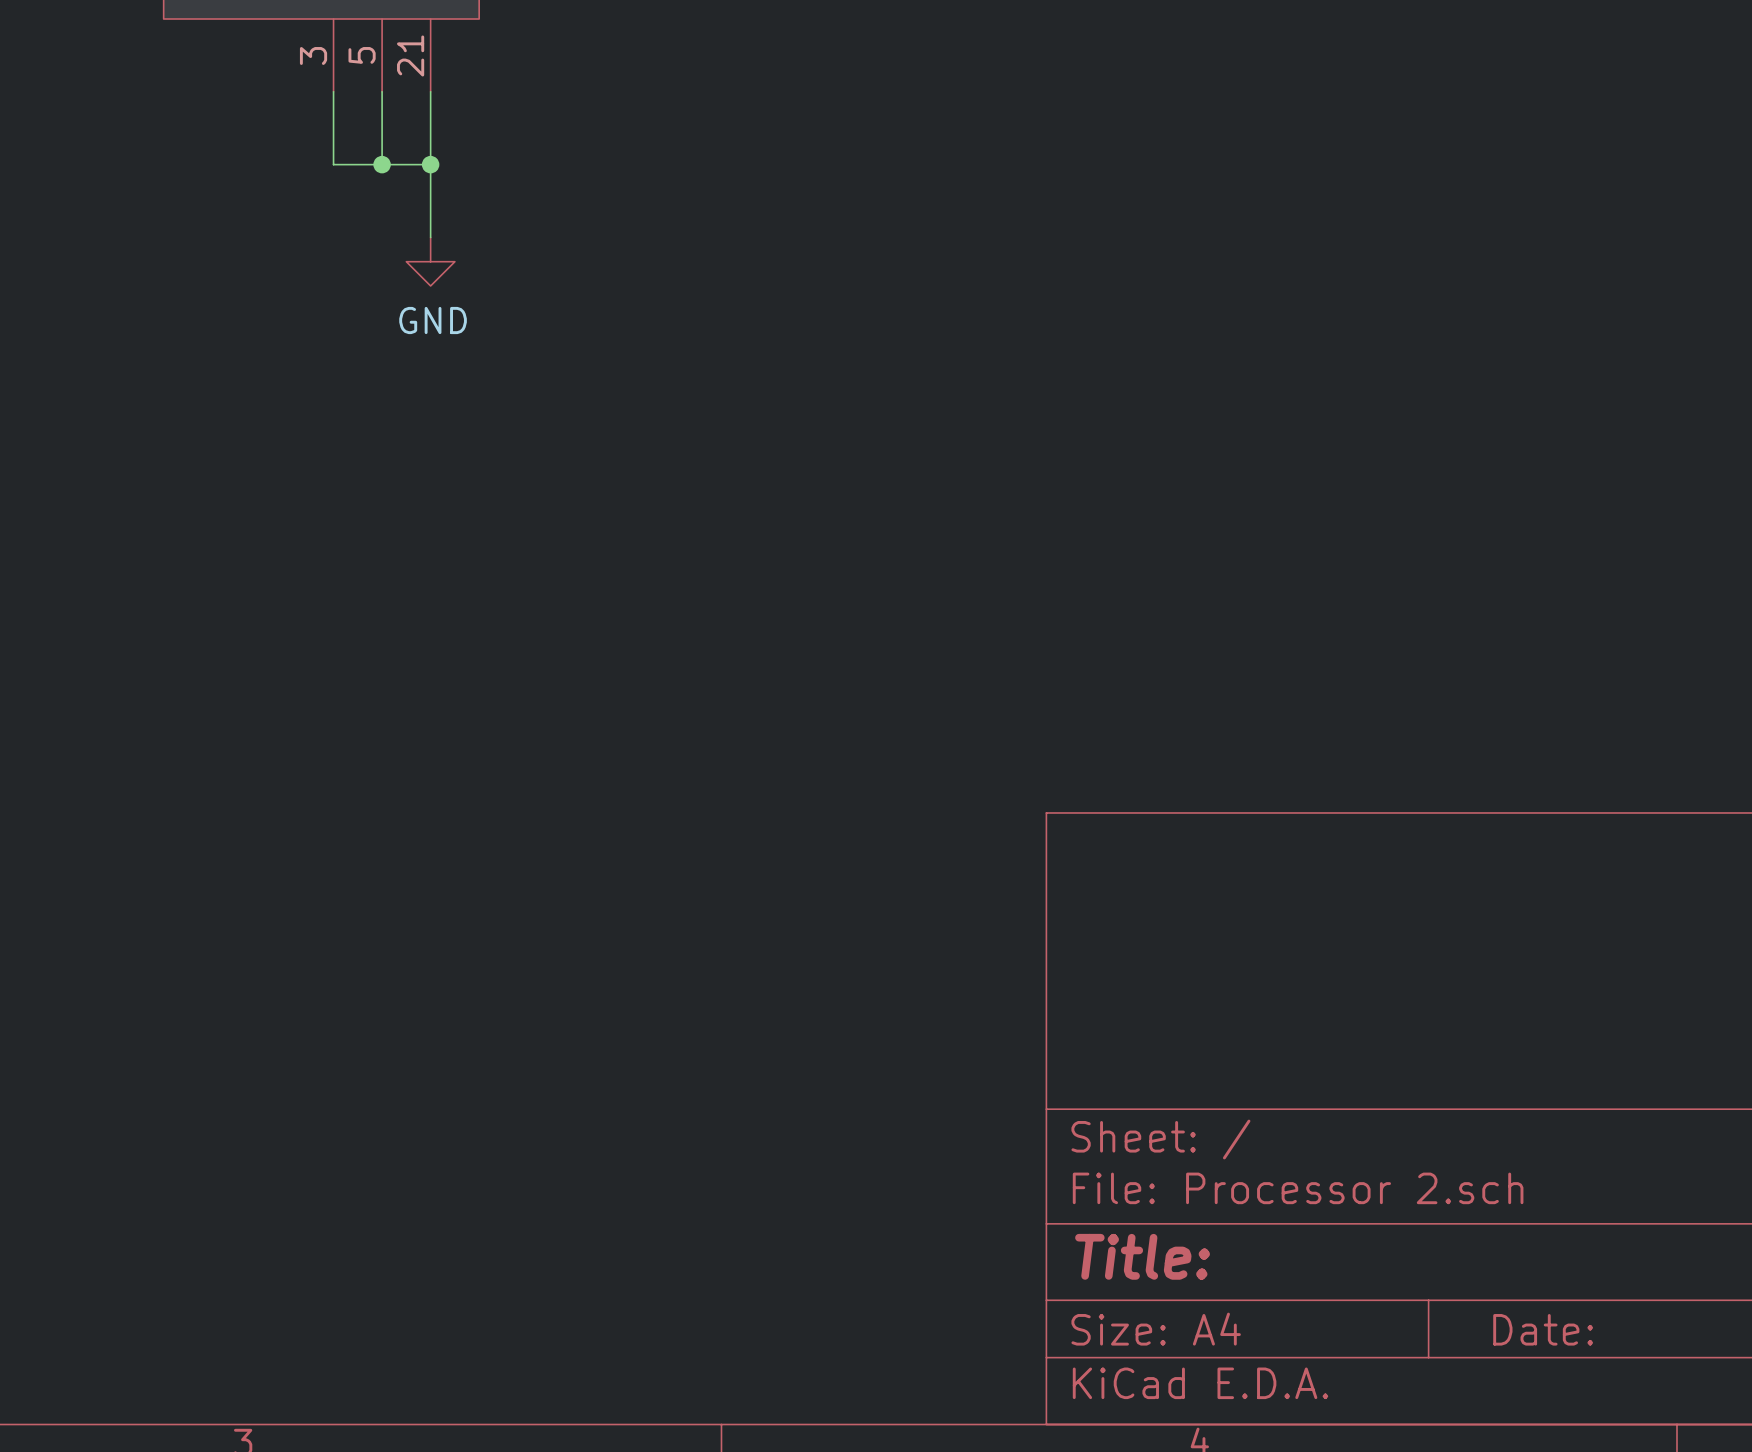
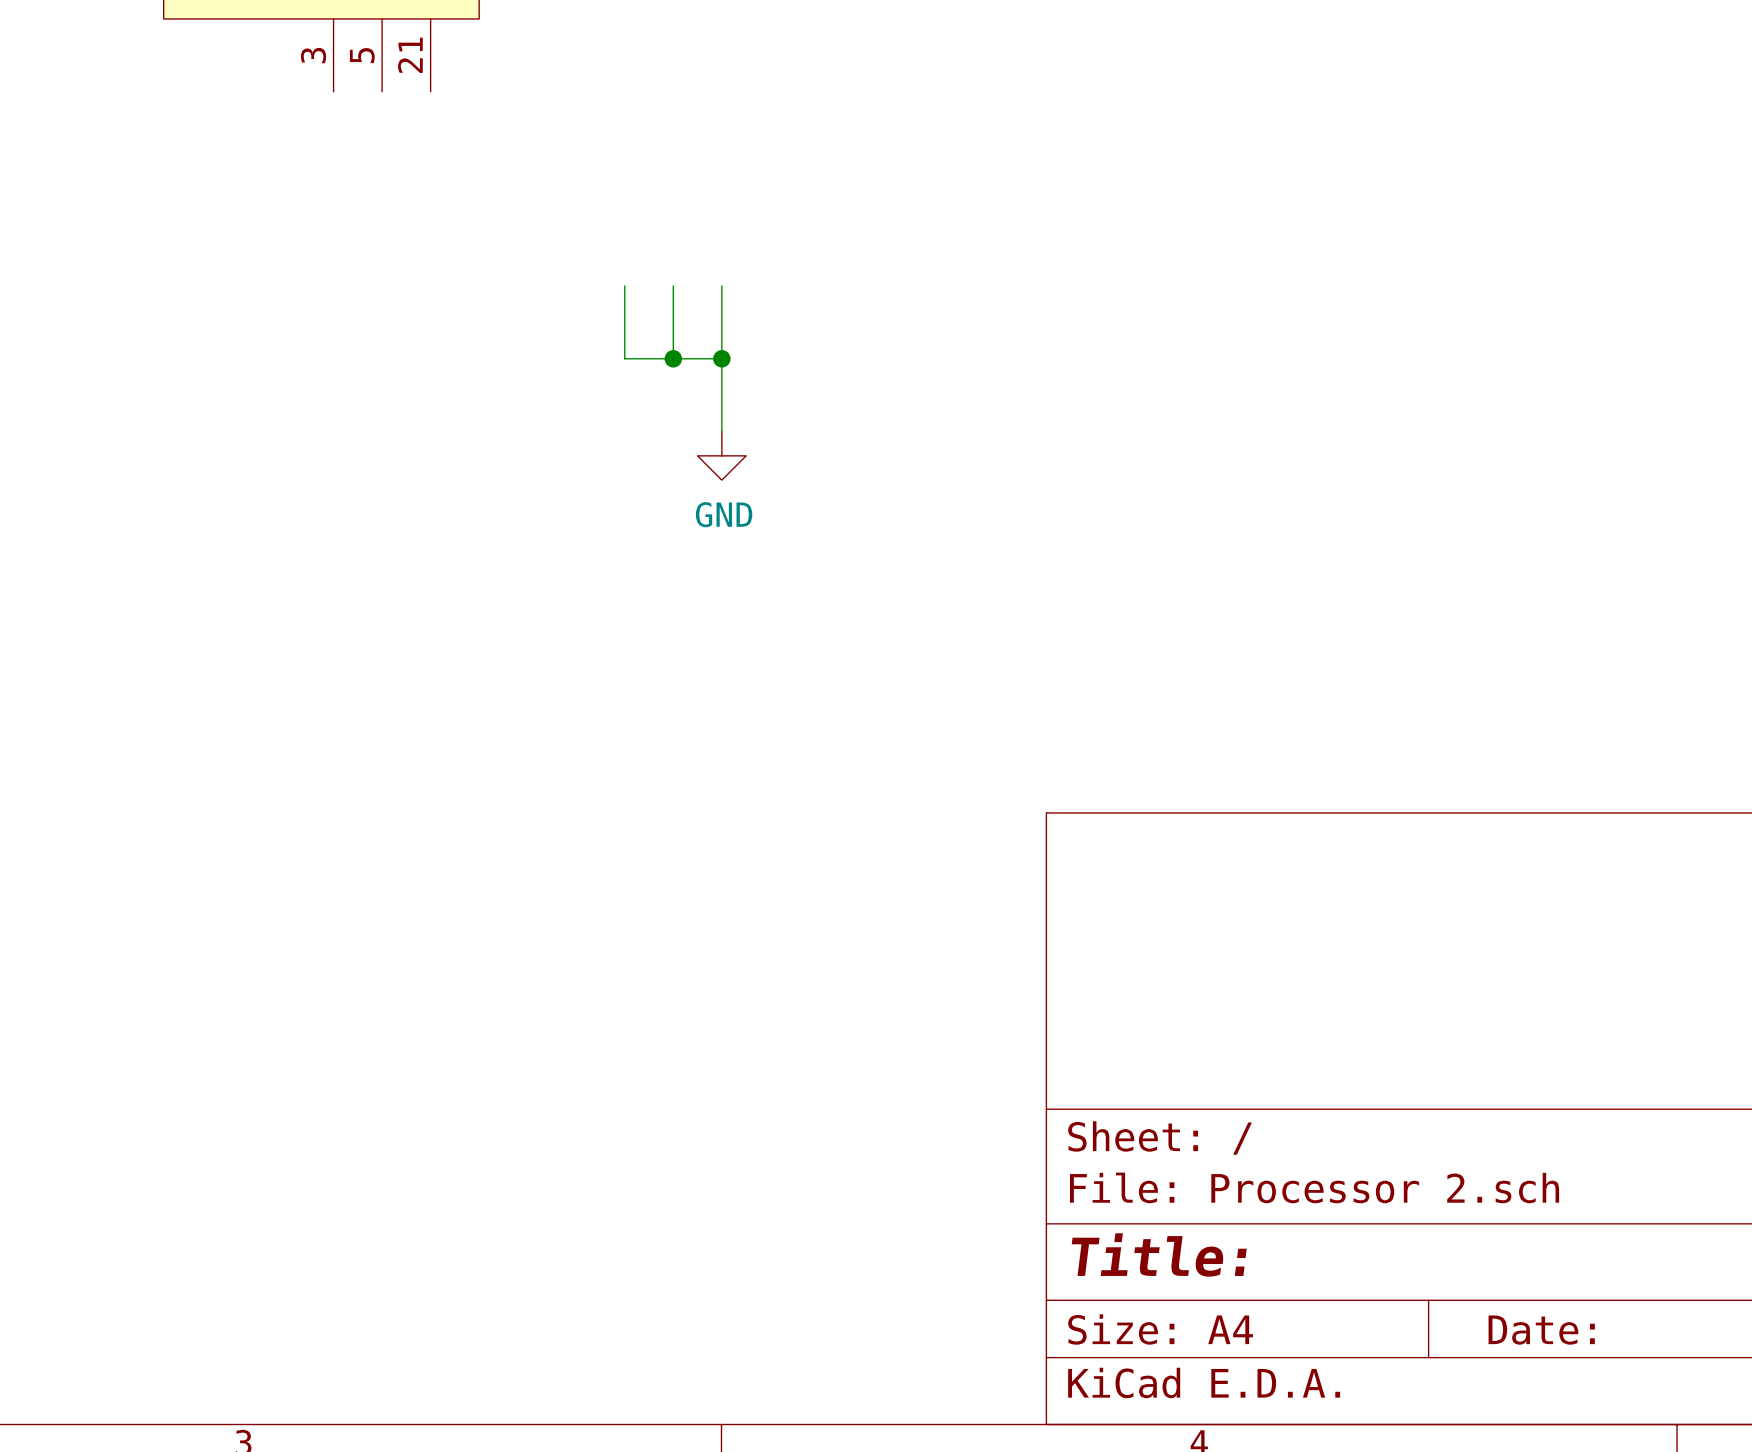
wire: (333, 91) (333, 164) (430, 164) -> (624, 285) (624, 358) (721, 358)
wire: (382, 91) (382, 164) -> (673, 285) (673, 358)
wire: (430, 91) (430, 237) -> (721, 285) (721, 431)
junction: (382, 164) -> none
junction: (430, 164) -> none
power symbol position: GND (430, 261) -> GND (721, 455)
junction: none -> (673, 358)
junction: none -> (721, 358)

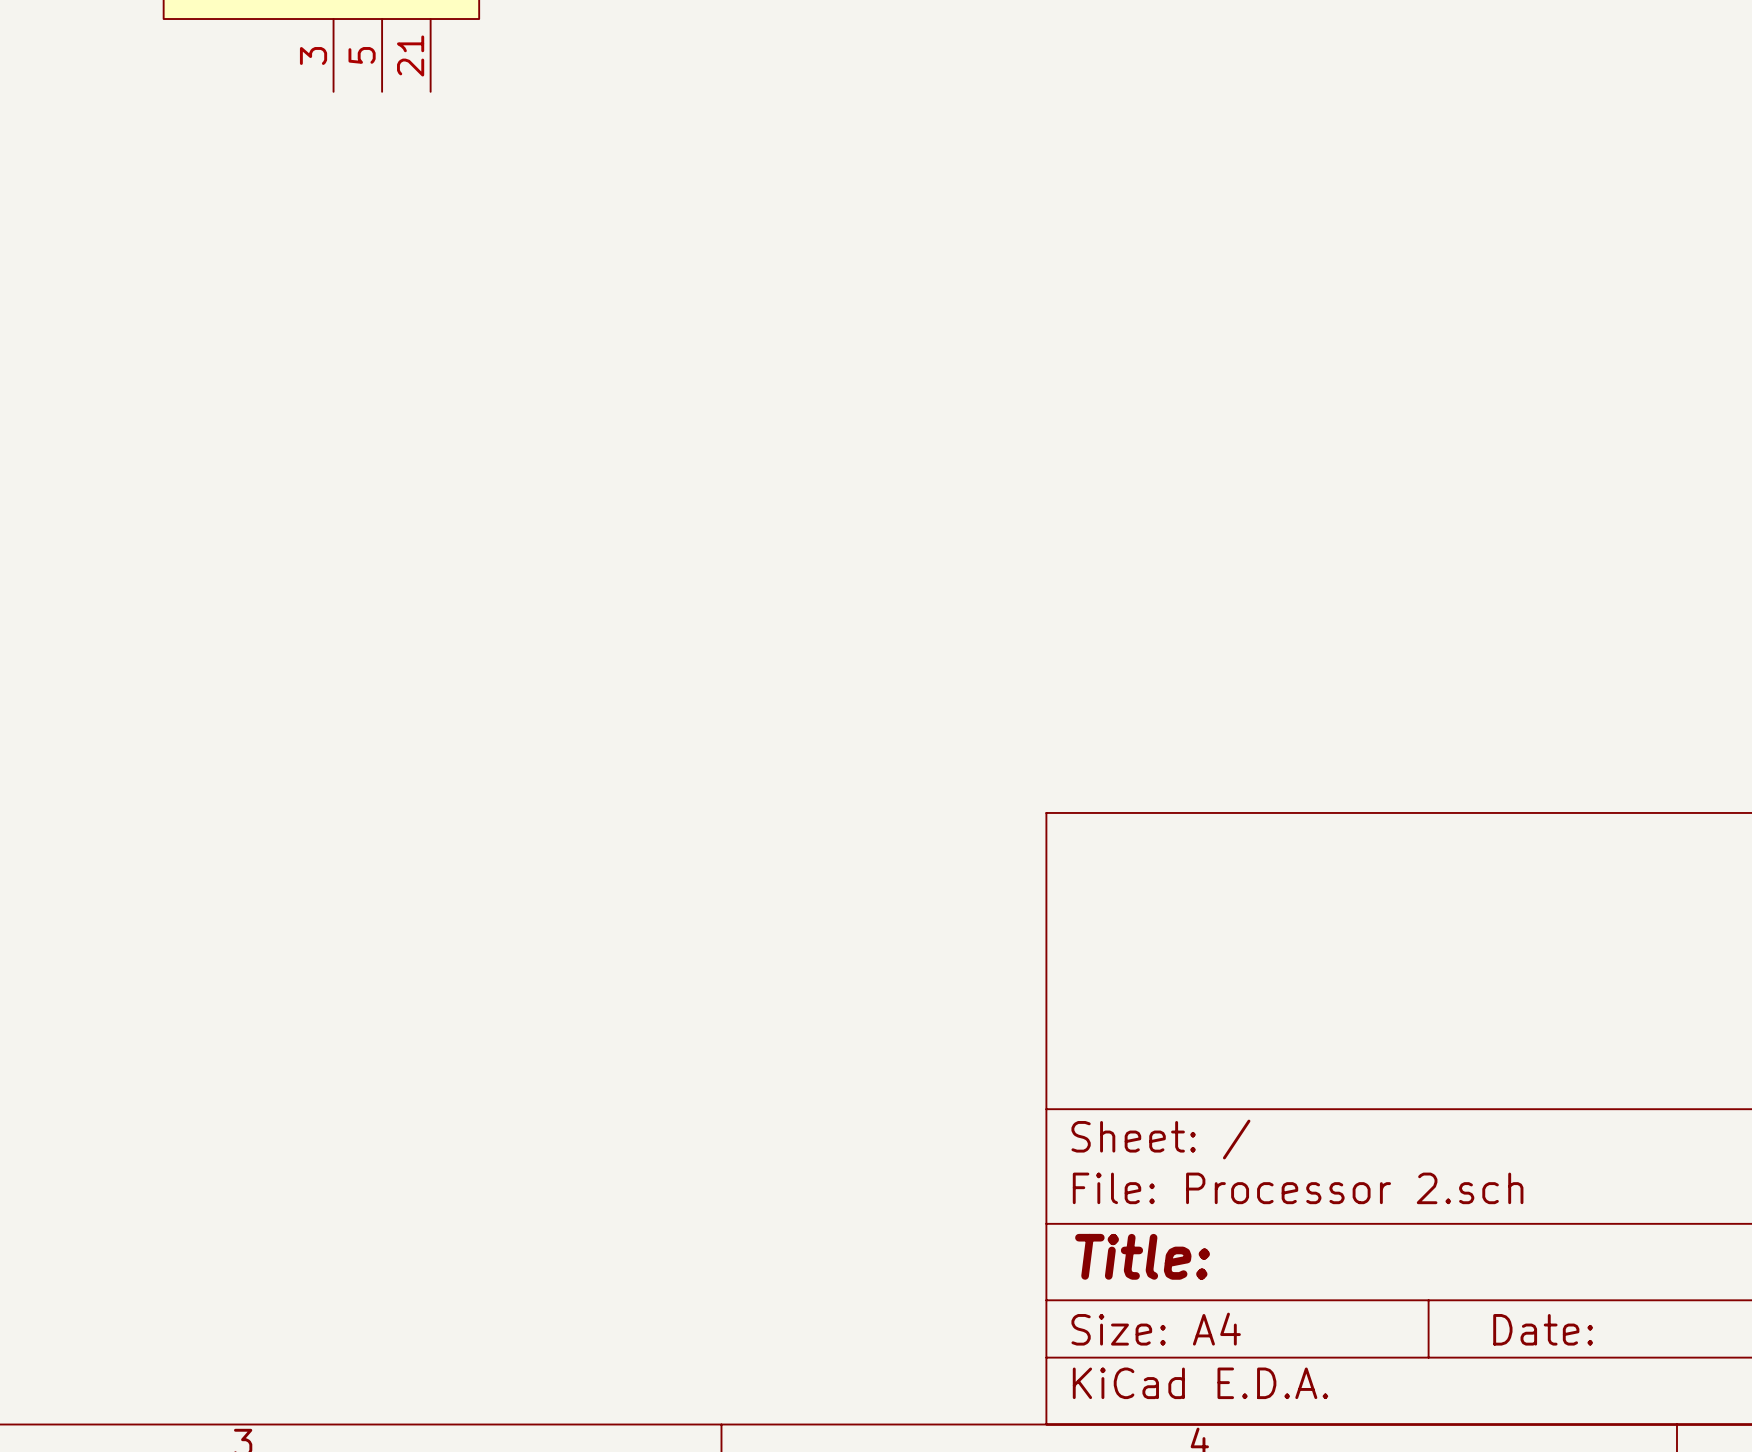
wire: (624, 285) (624, 358) (721, 358) -> none
wire: (673, 285) (673, 358) -> none
wire: (721, 285) (721, 431) -> none
junction: (673, 358) -> none
junction: (721, 358) -> none
power symbol: GND (721, 455) -> none

